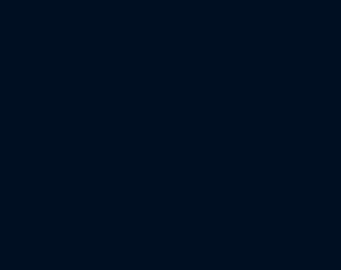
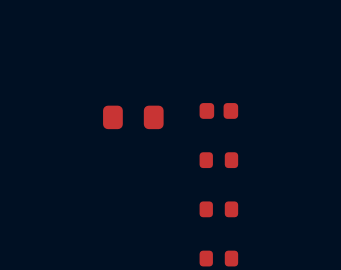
part: none -> (218, 110)
part: none -> (133, 117)
part: none -> (218, 160)
part: none -> (218, 209)
part: none -> (218, 258)

